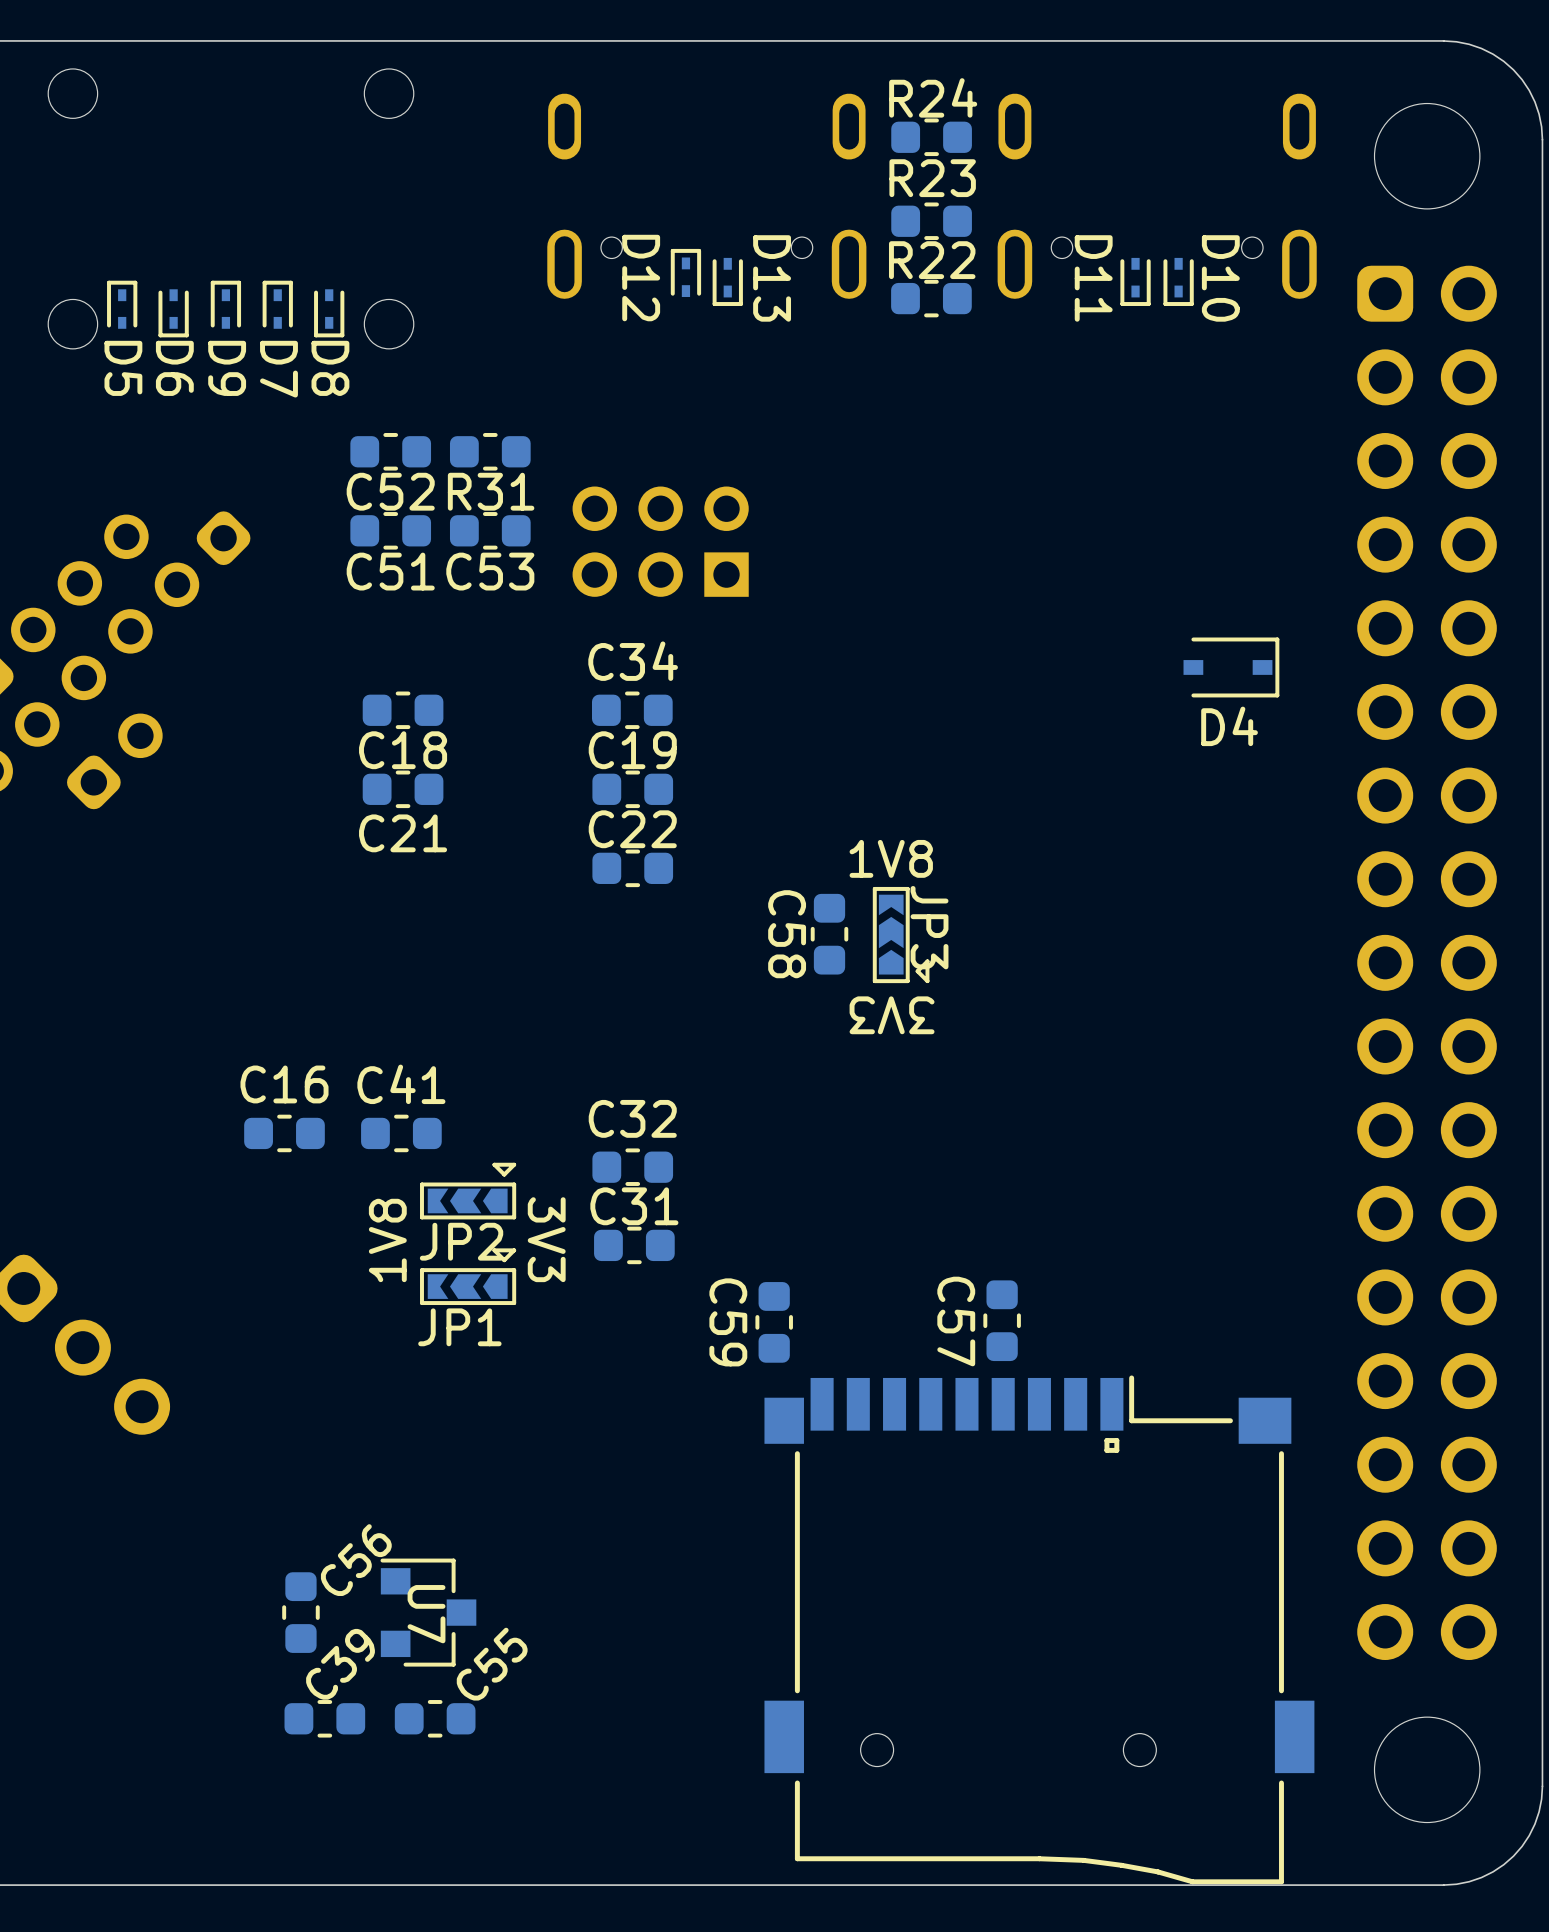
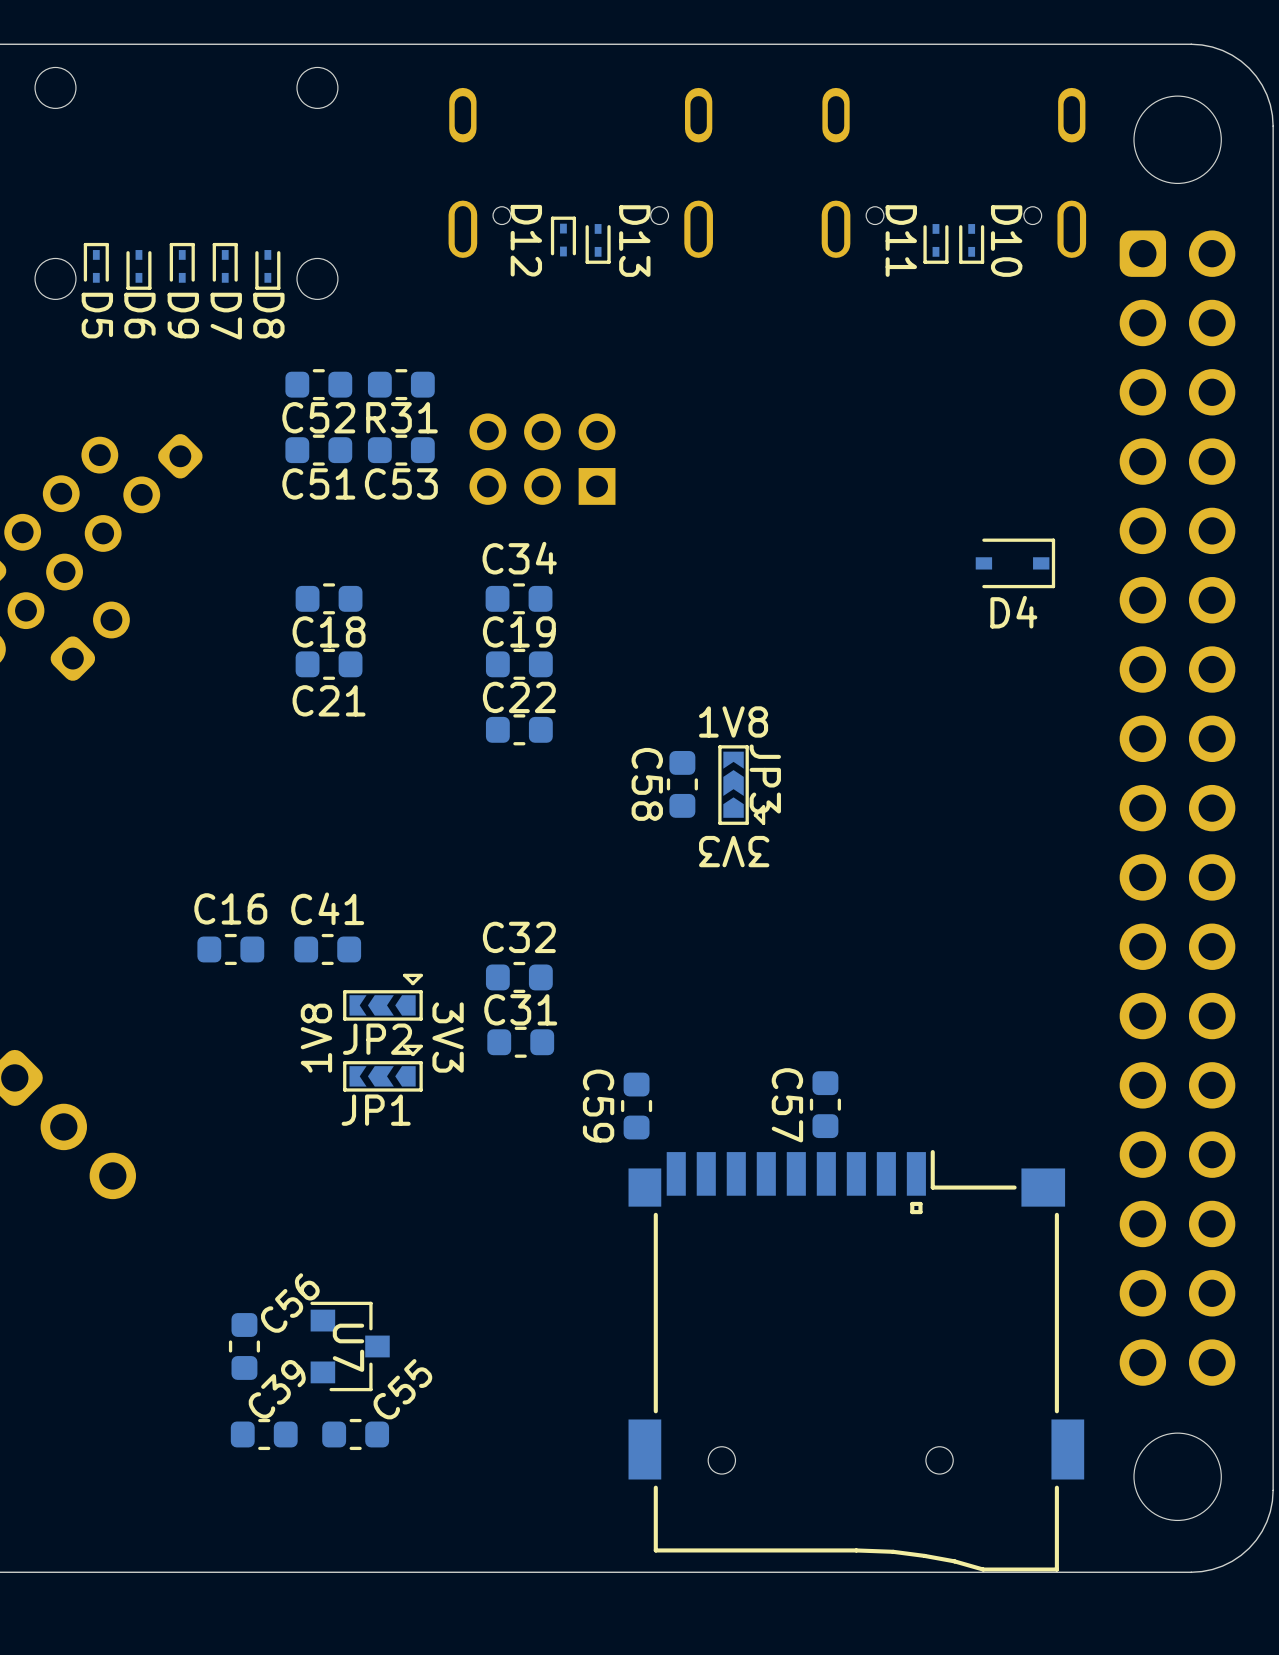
R24: (931, 137) -> none
R23: (931, 221) -> none
R22: (931, 298) -> none

